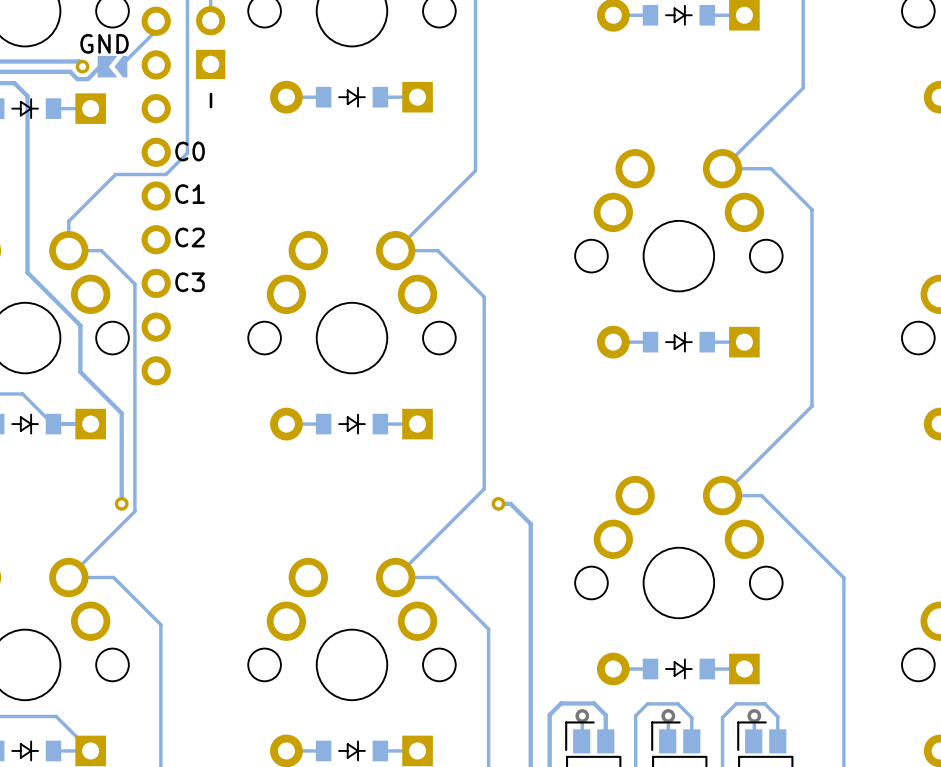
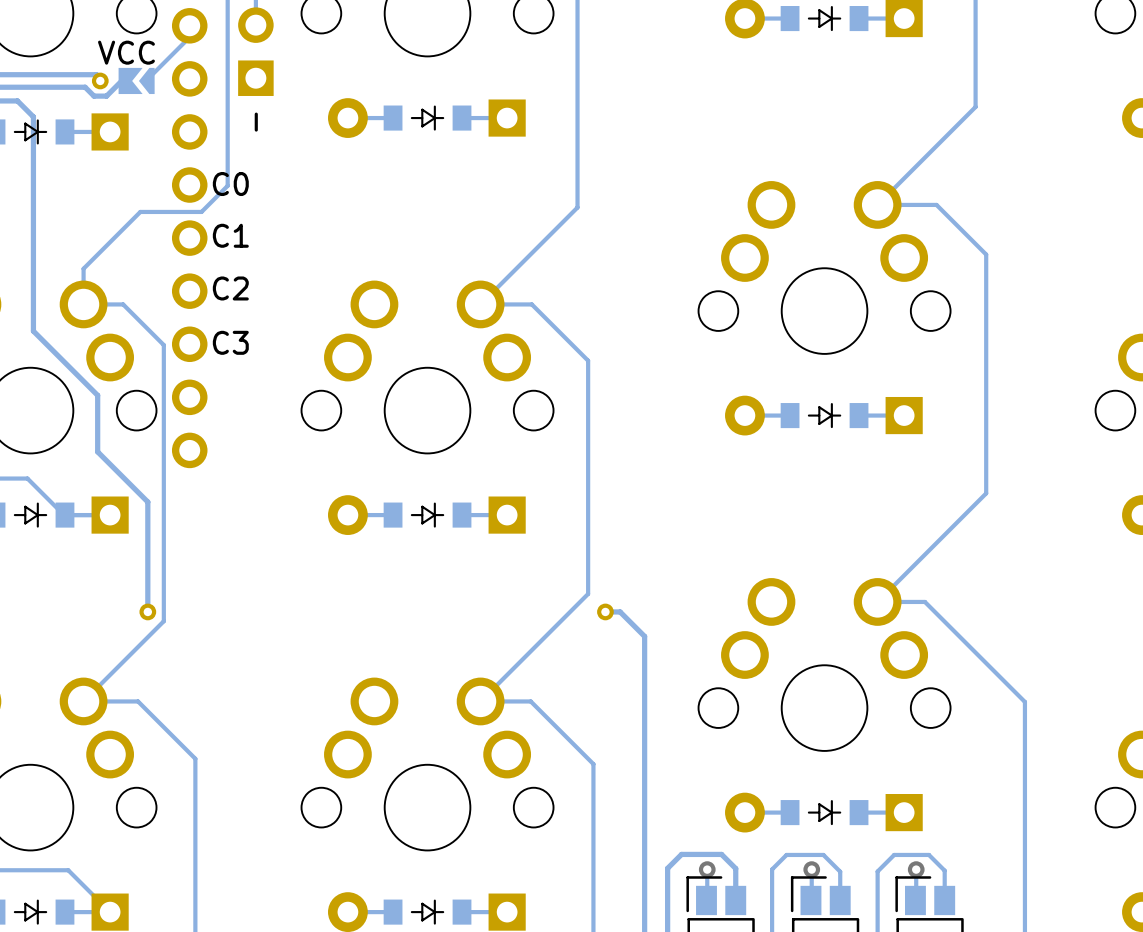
text: GND (104, 43) -> VCC (126, 52)

